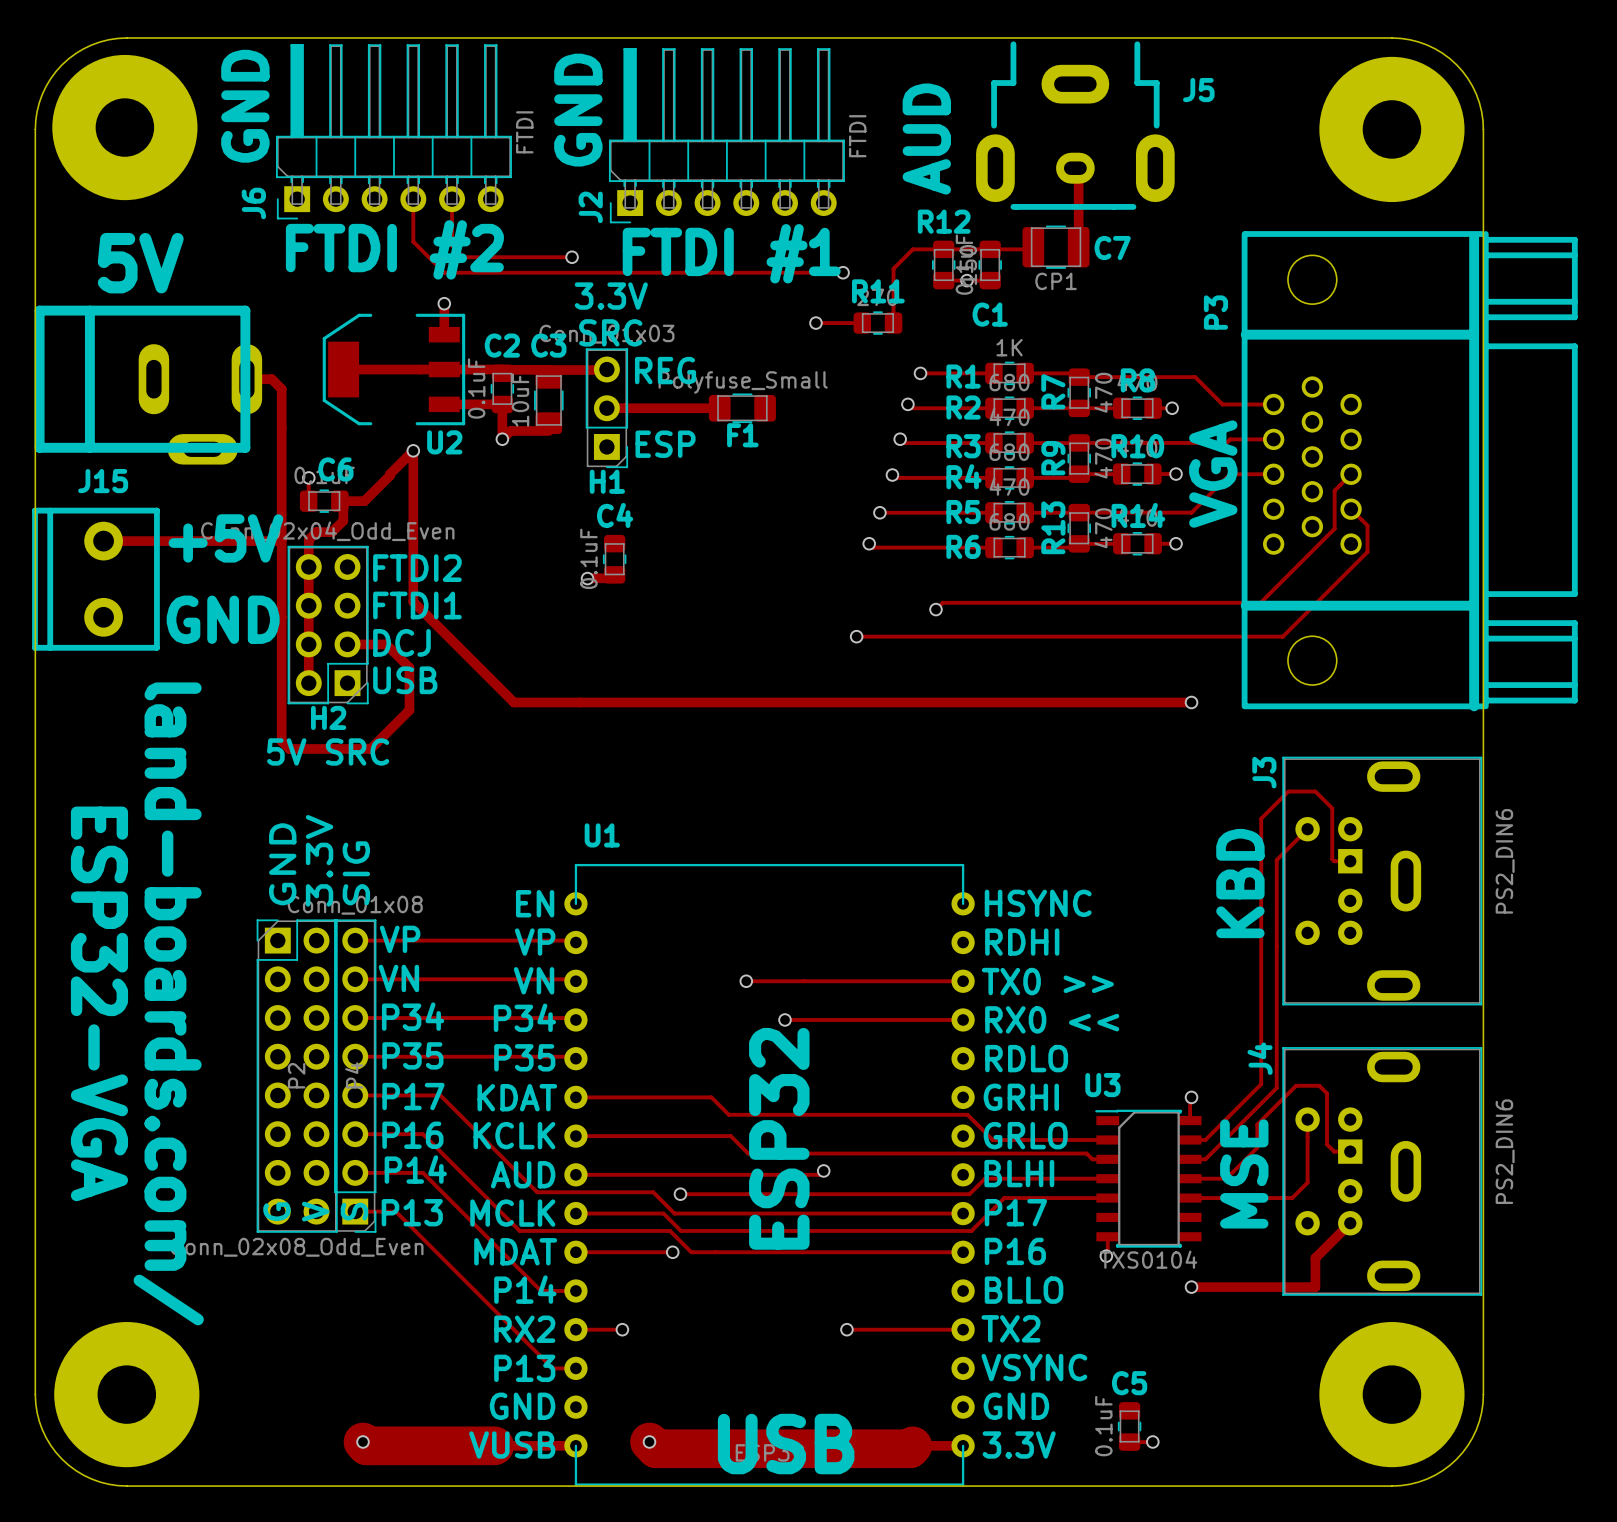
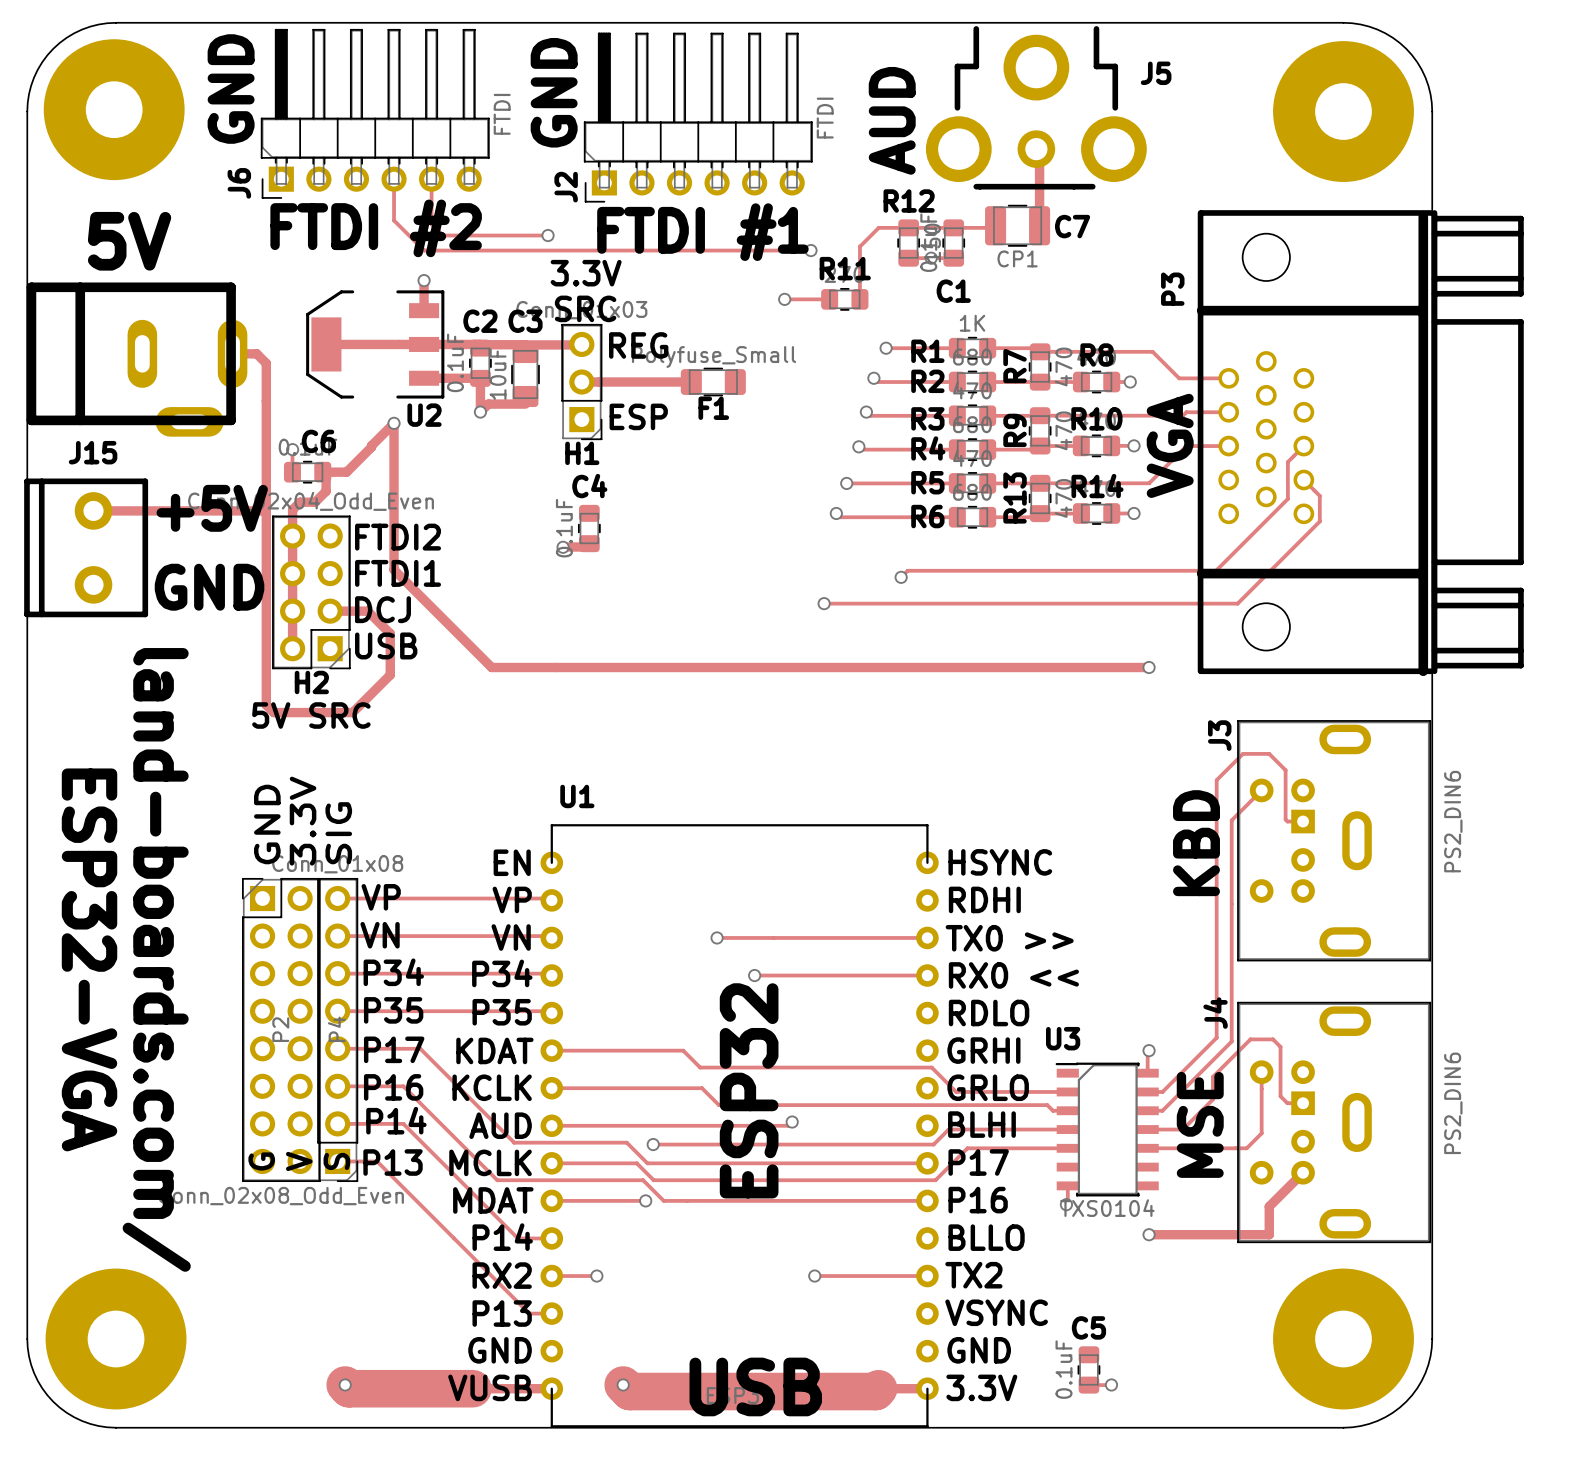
J5 footprint: [976, 41, 1175, 210] -> [925, 26, 1147, 190]

